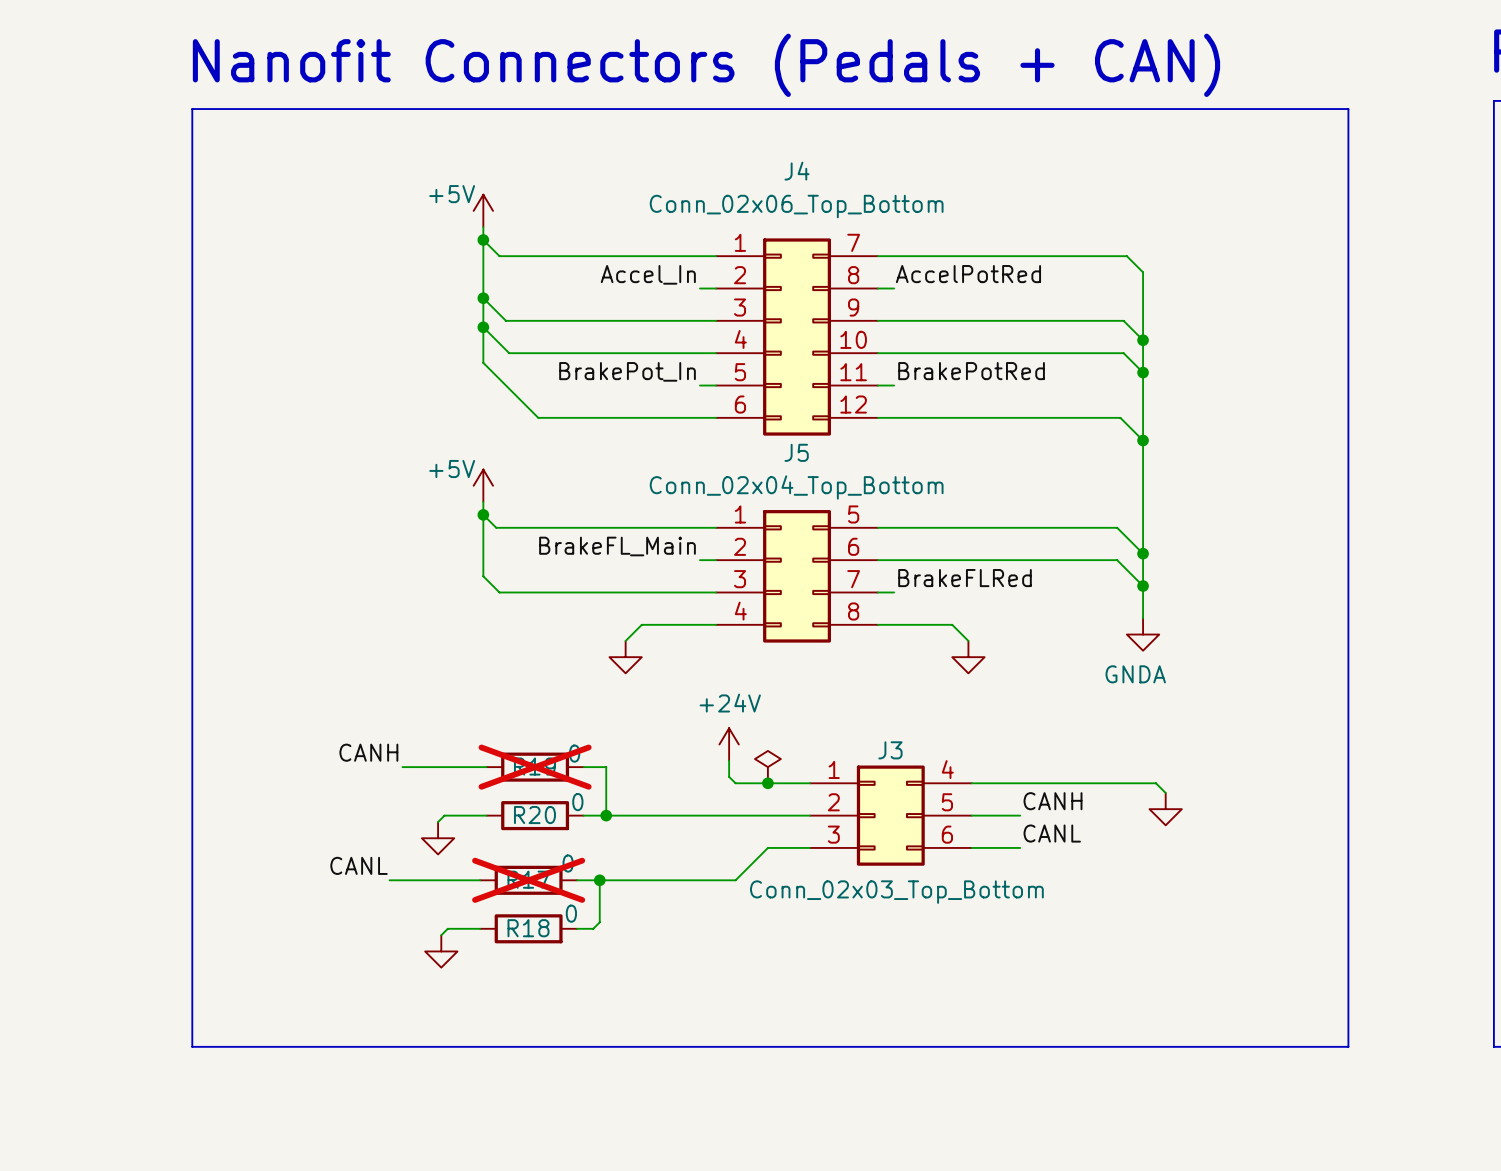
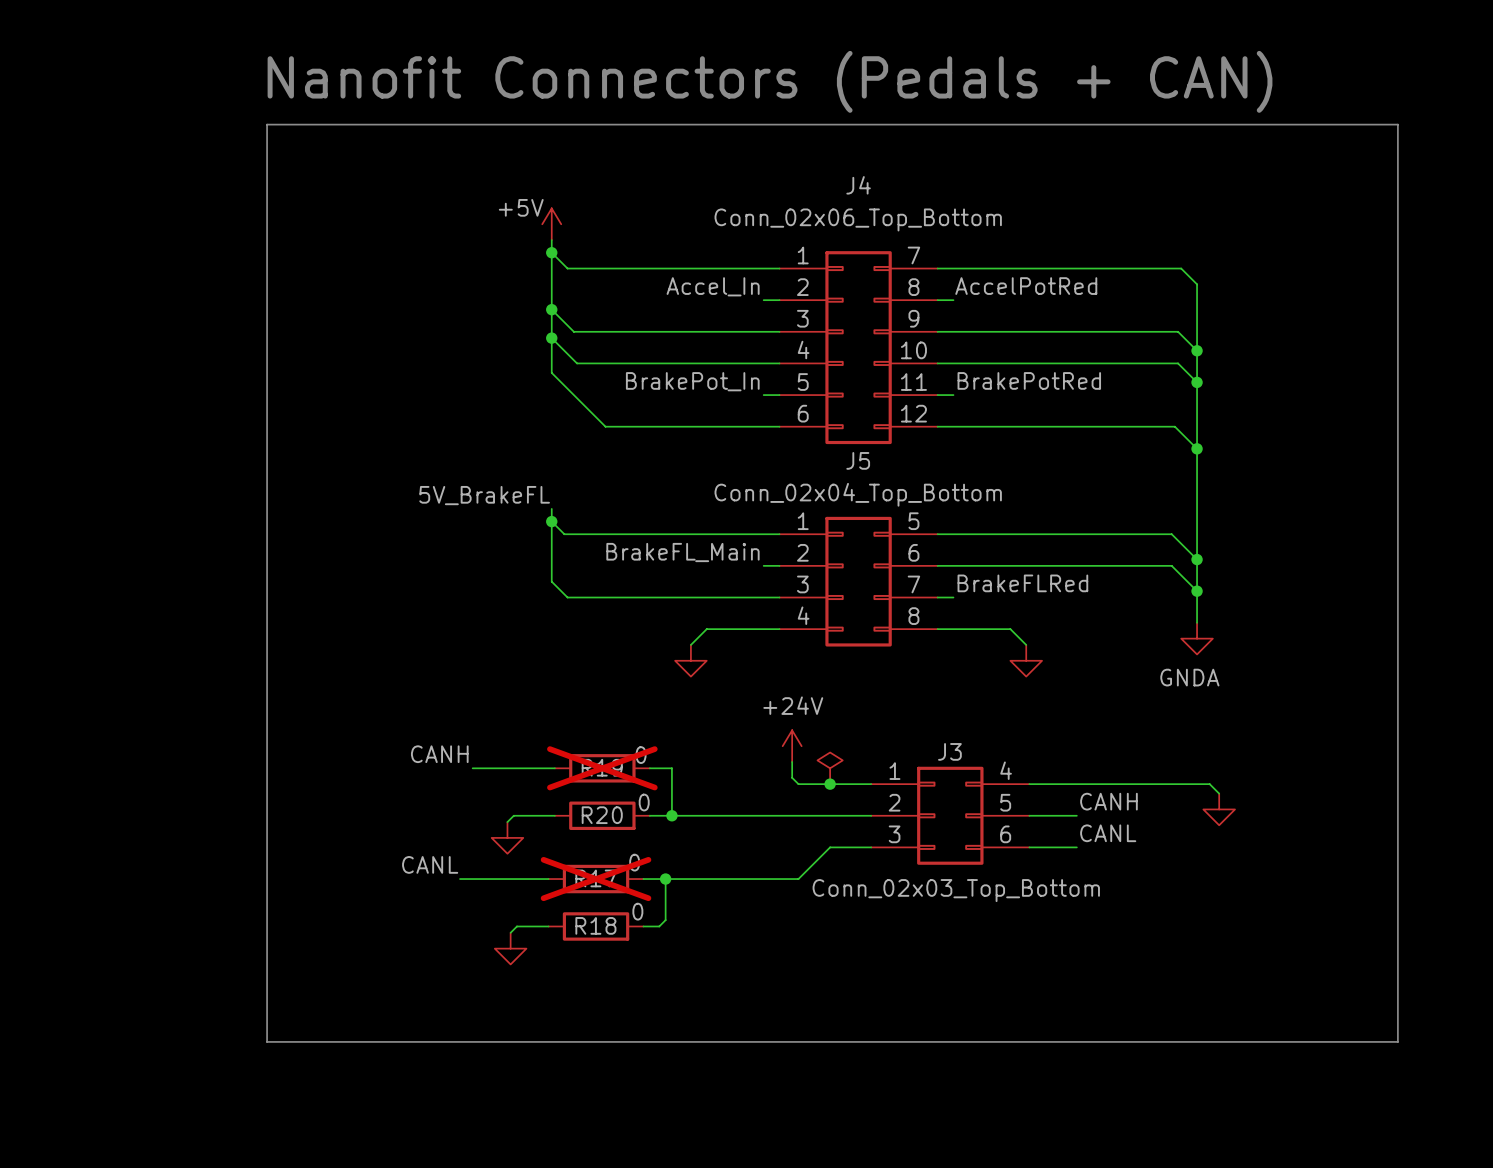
power symbol: +5V (483, 485) -> none
label: none -> 5V_BrakeFL (484, 495)

